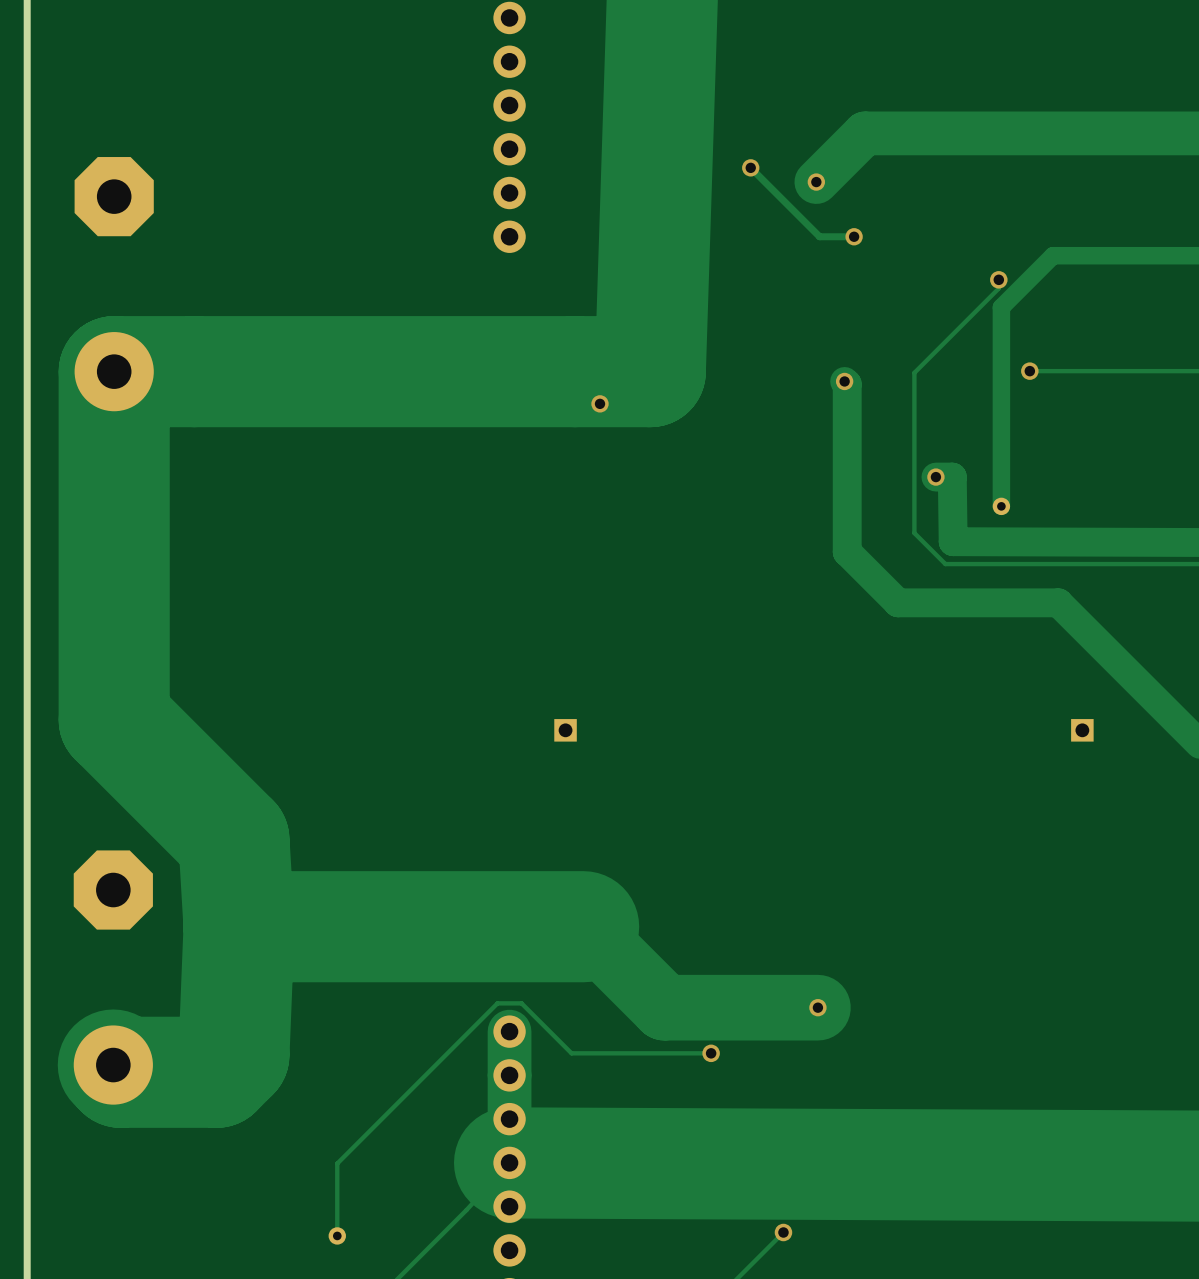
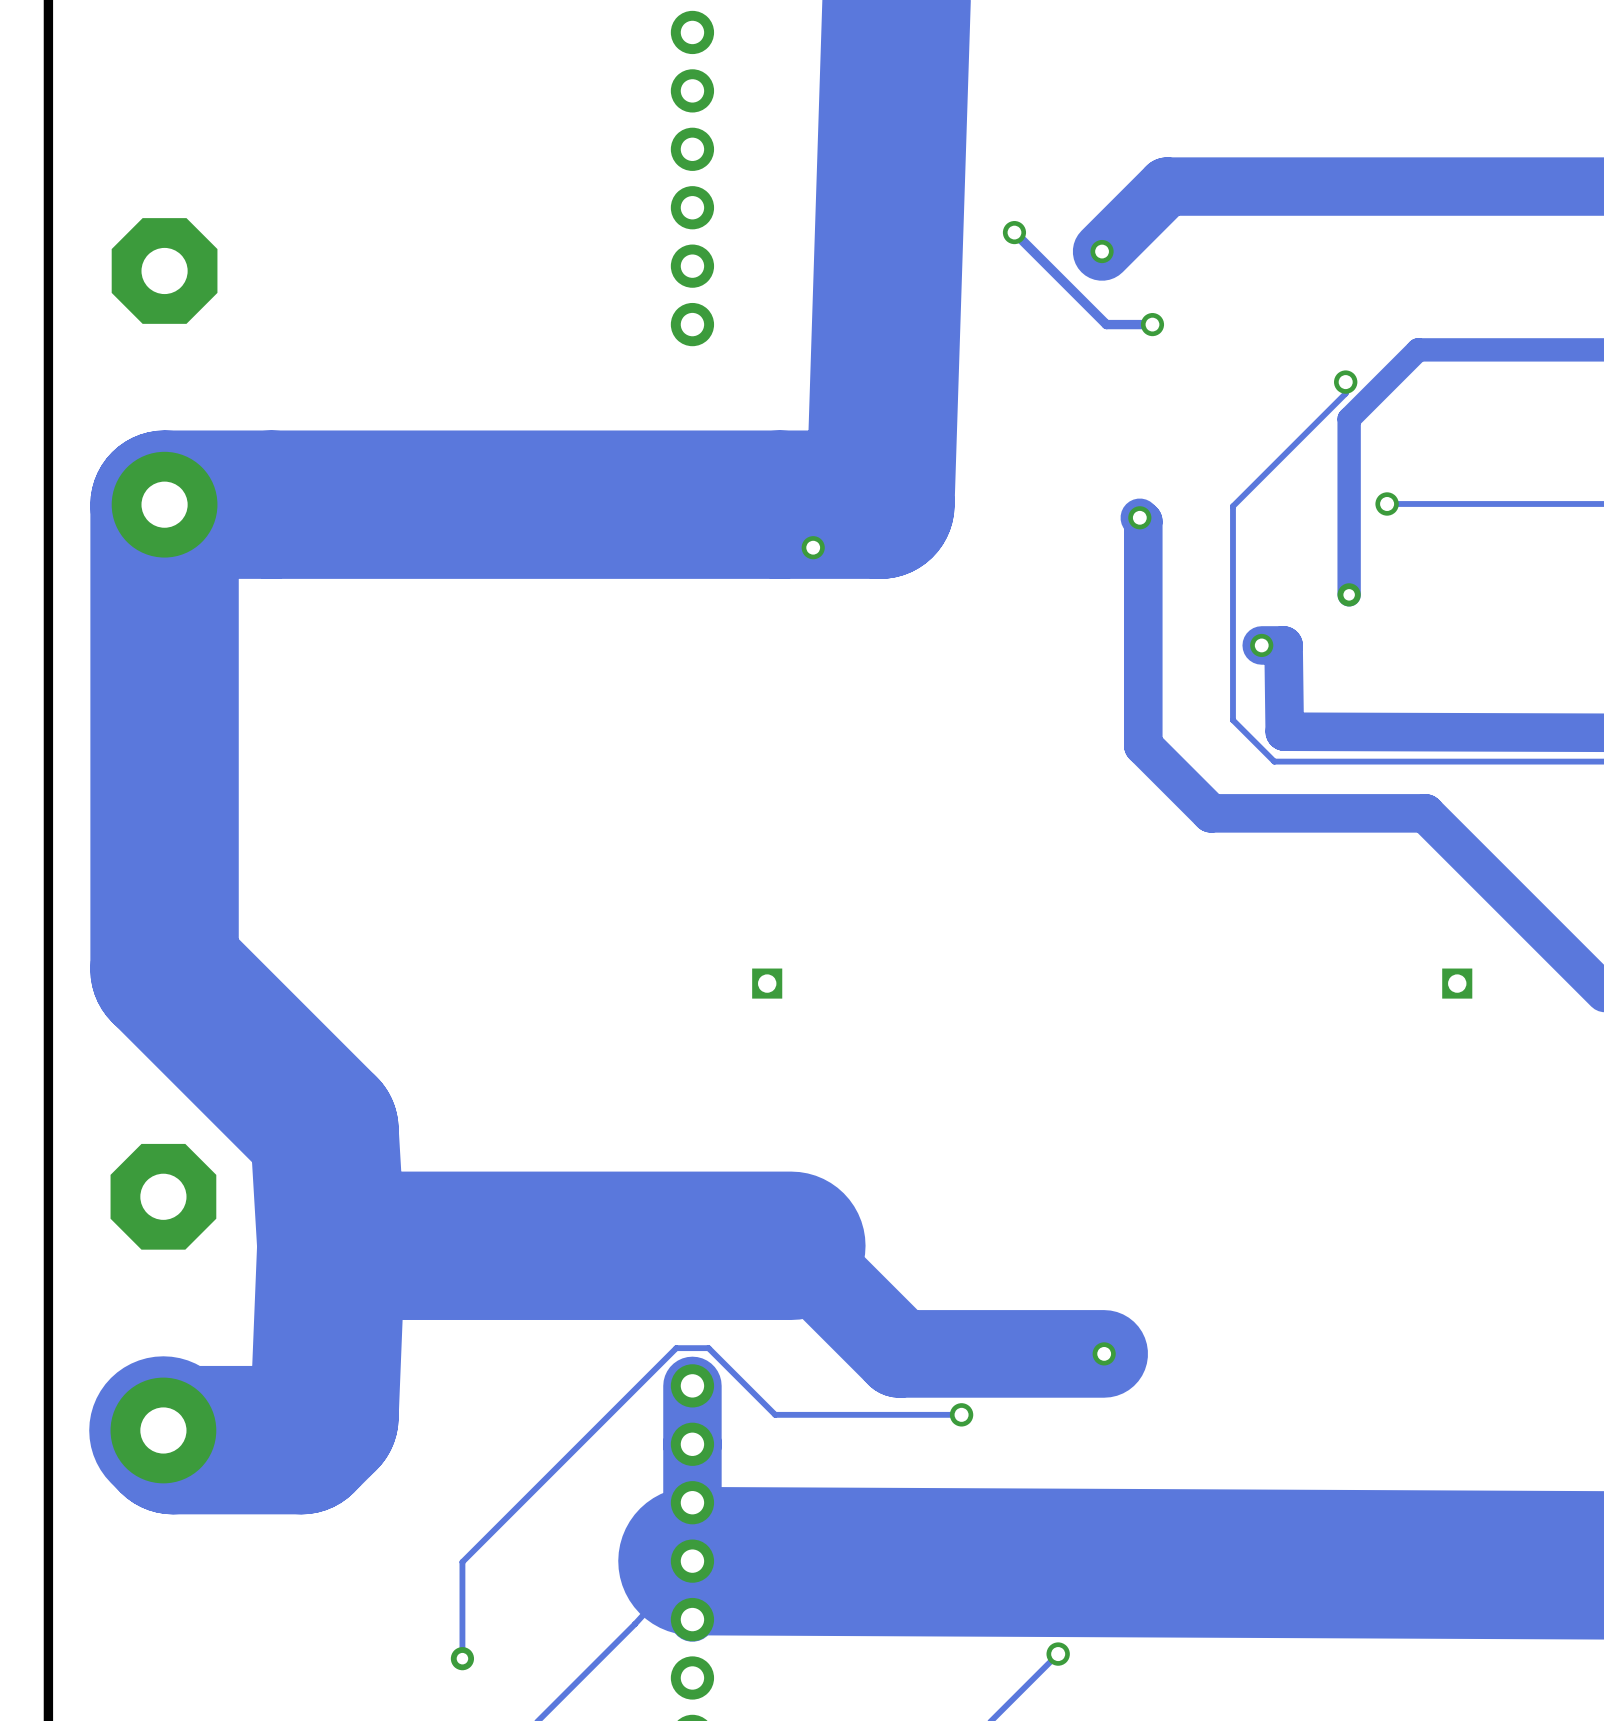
track: (1001, 439) (1001, 506) -> none
part position: (1001, 506) -> (1349, 594)

